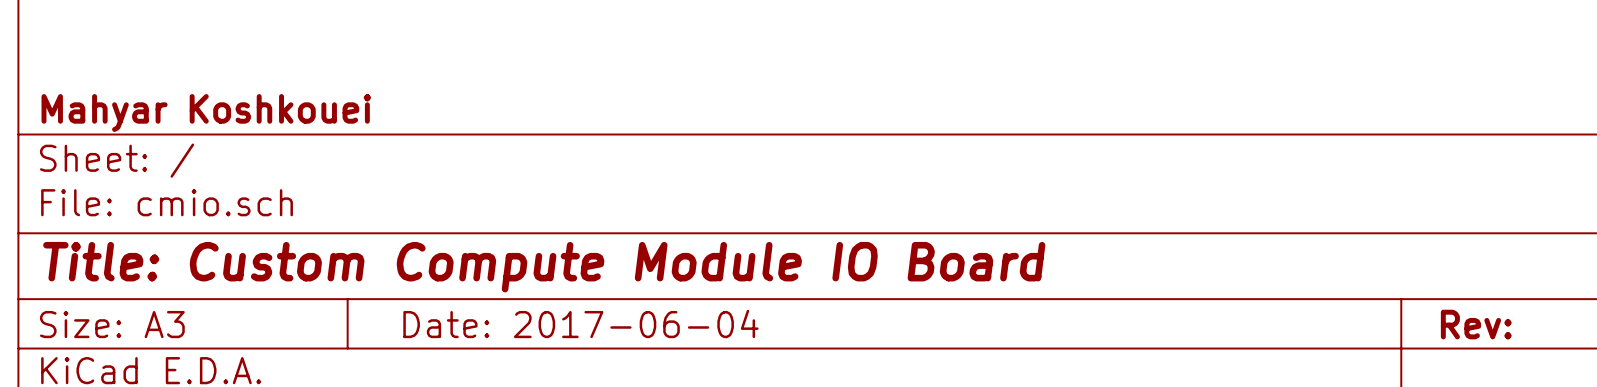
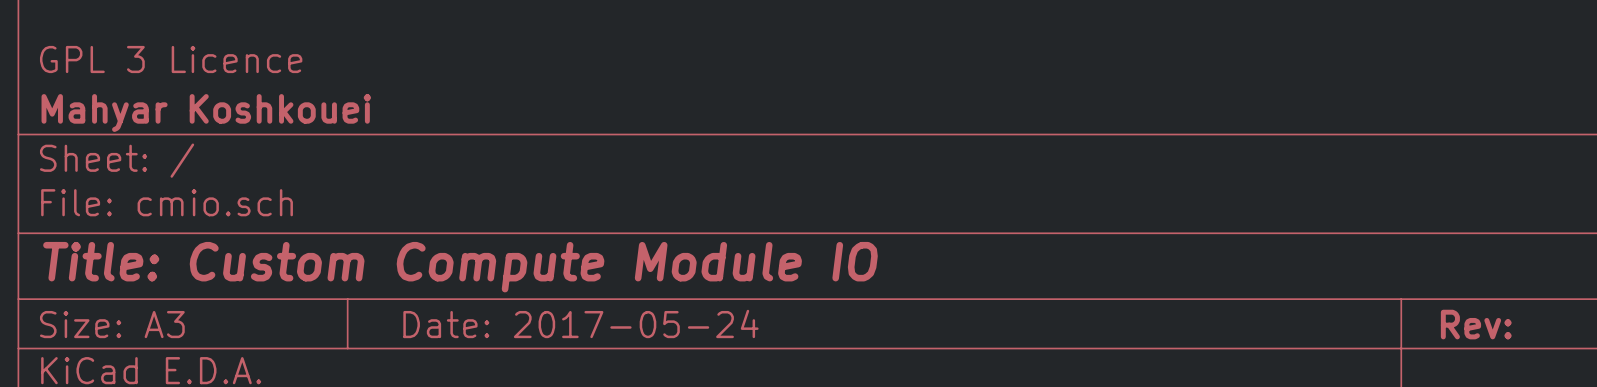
title block: none -> GPL 3 Licence (171, 59)
title block: Title: Custom Compute Module IO Board (544, 267) -> Title: Custom Compute Module IO (460, 267)
title block: Date: 2017-06-04 (580, 323) -> Date: 2017-05-24 (580, 323)

